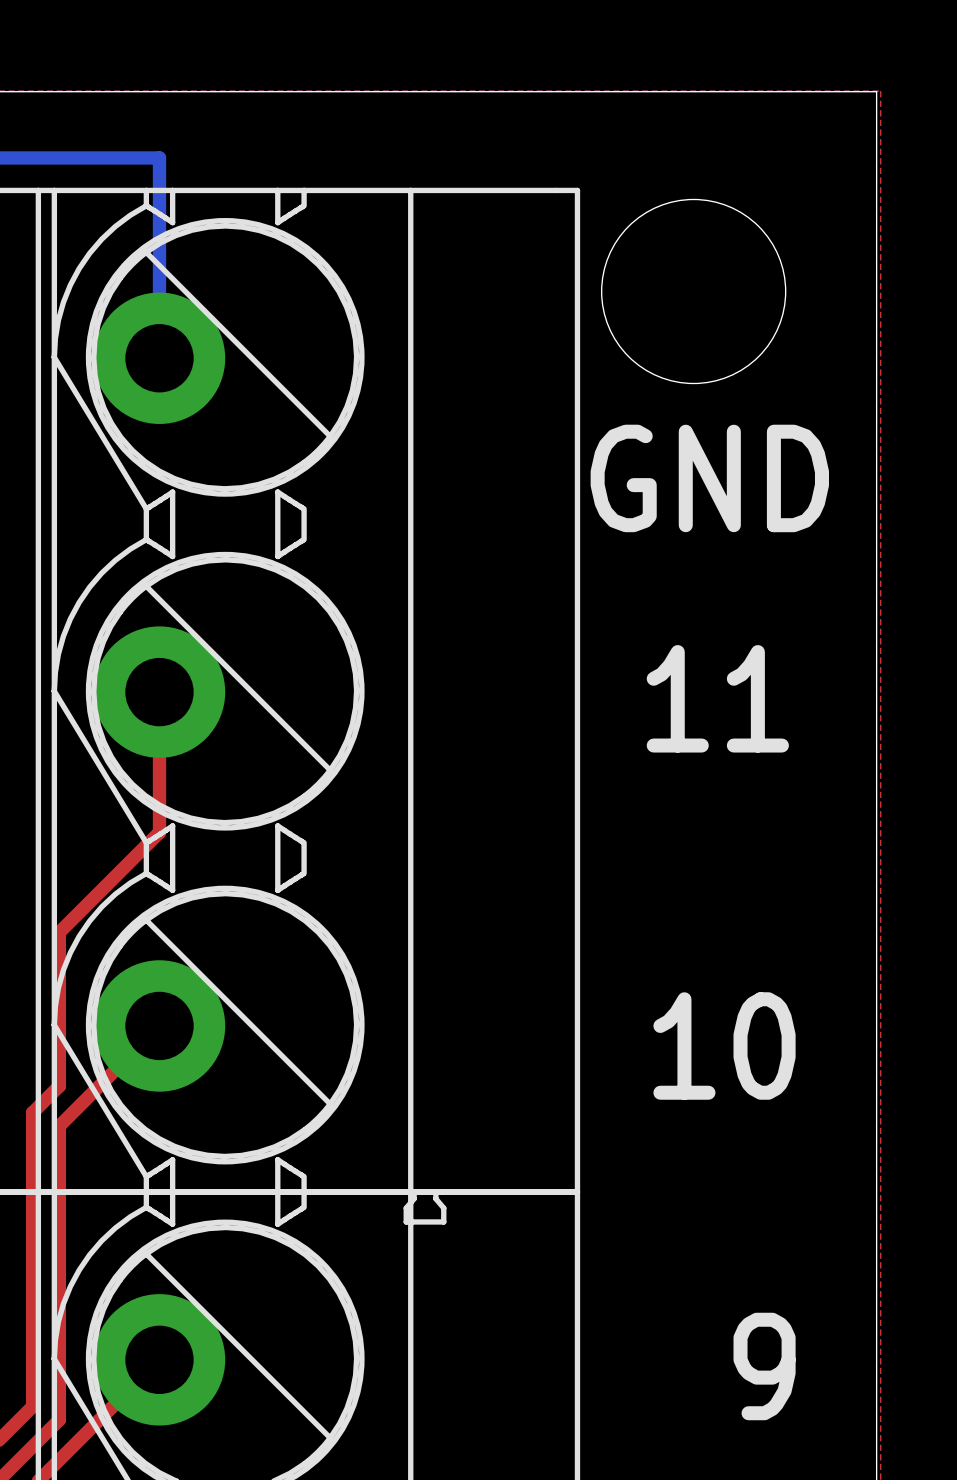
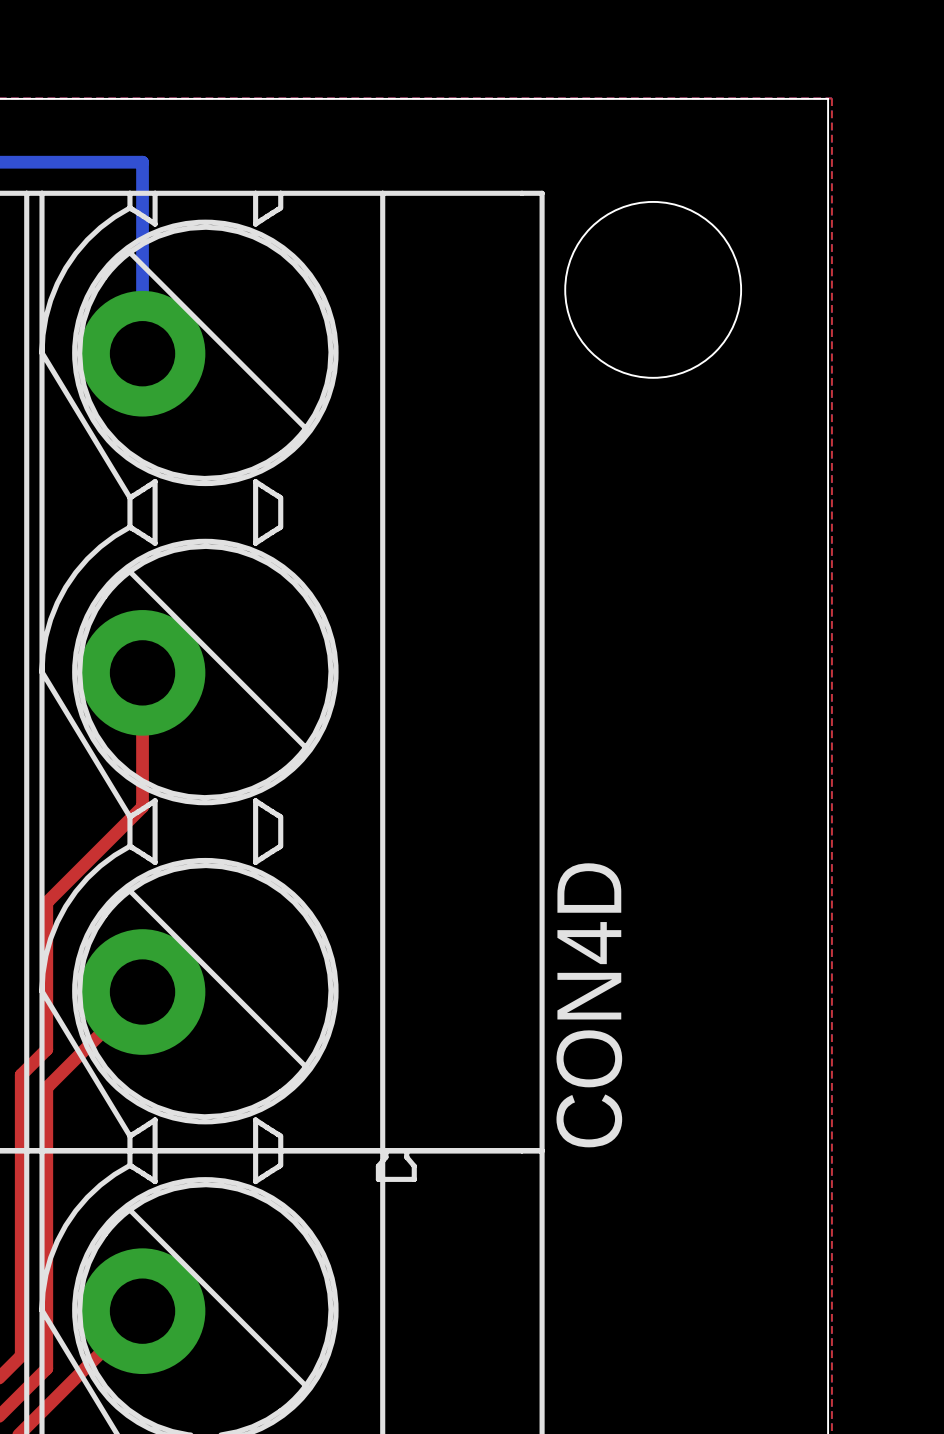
text: GND (709, 478) -> none
text: 11 (717, 698) -> none
CON4D name: none -> CON4D (589, 1005)
text: 10 (724, 1046) -> none
text: 9 (764, 1366) -> none

